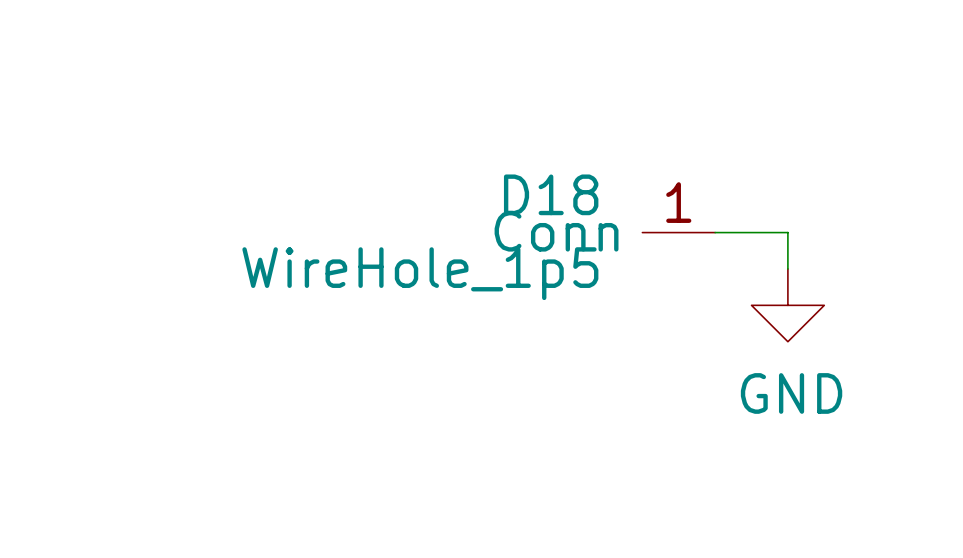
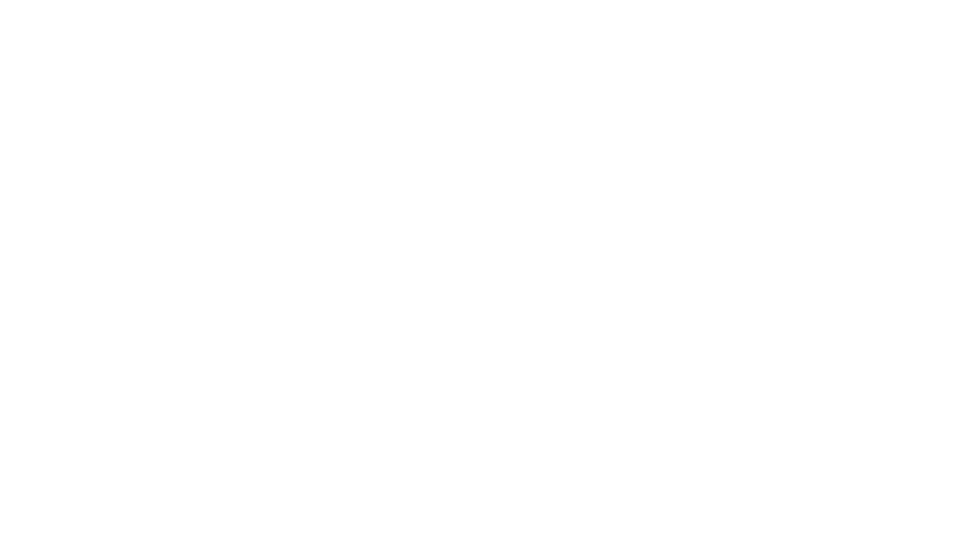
D18: WireHole_1p5 (678, 232) -> none
wire: (715, 232) (787, 232) (787, 268) -> none
power symbol: GND (787, 305) -> none

